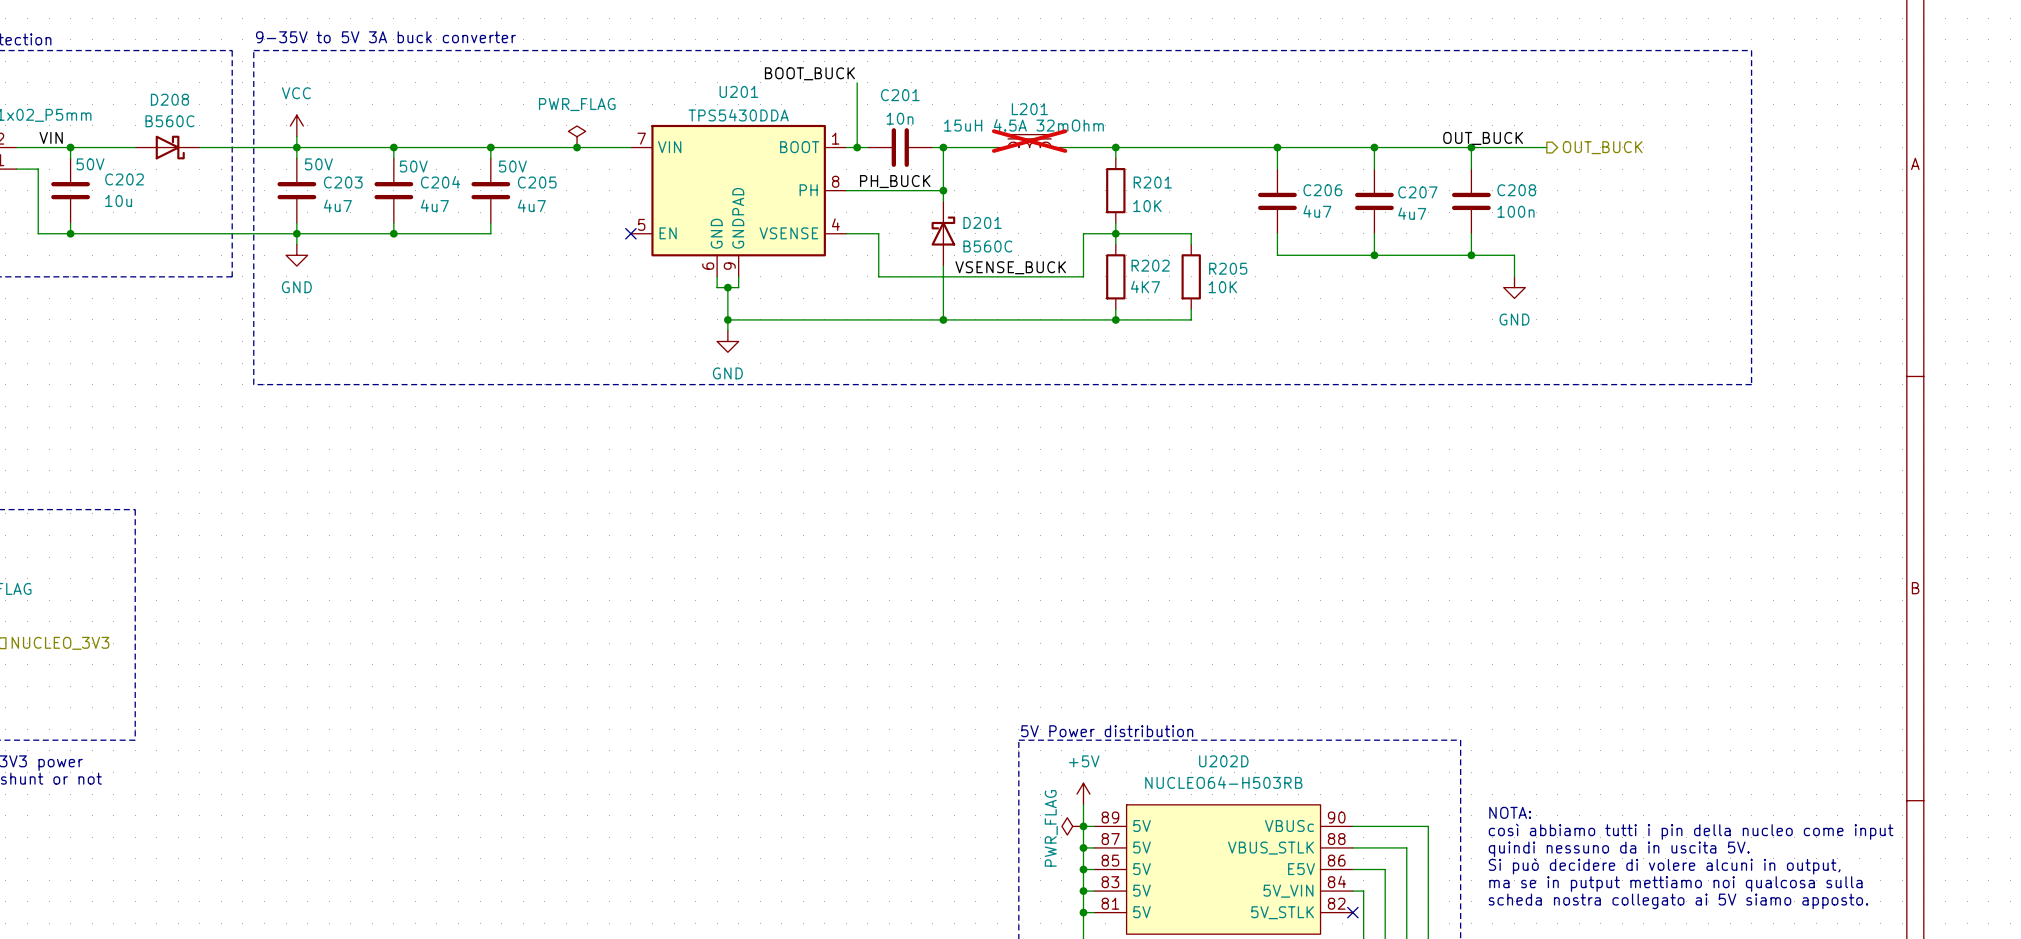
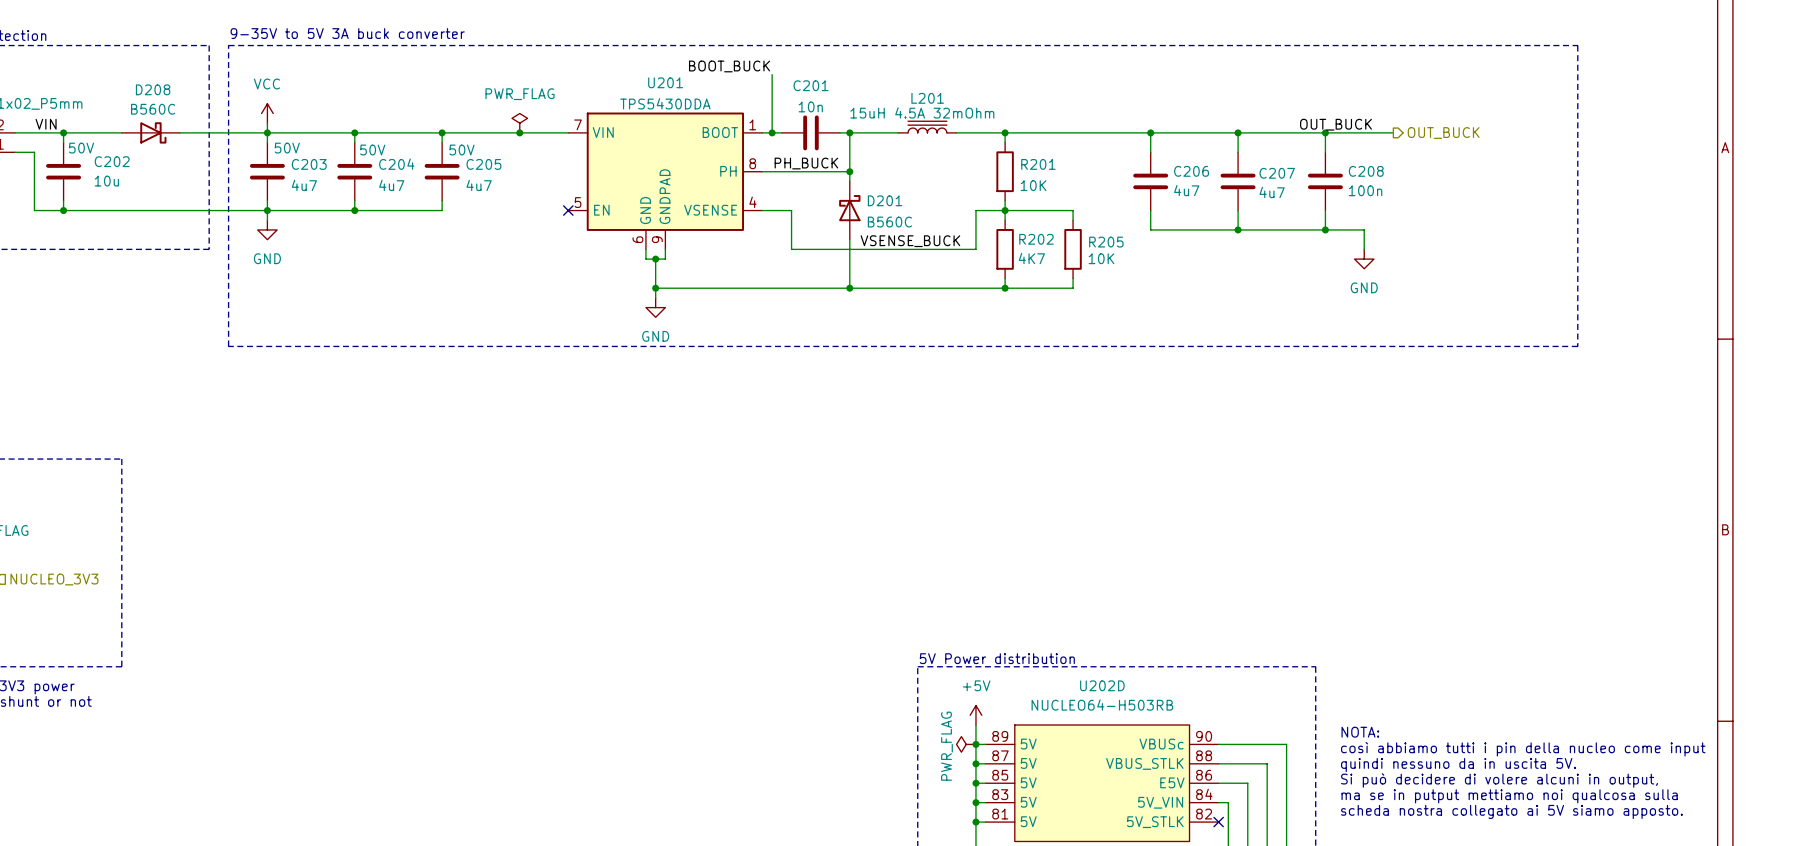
L201 do-not-place cross: (1029, 141) -> none

